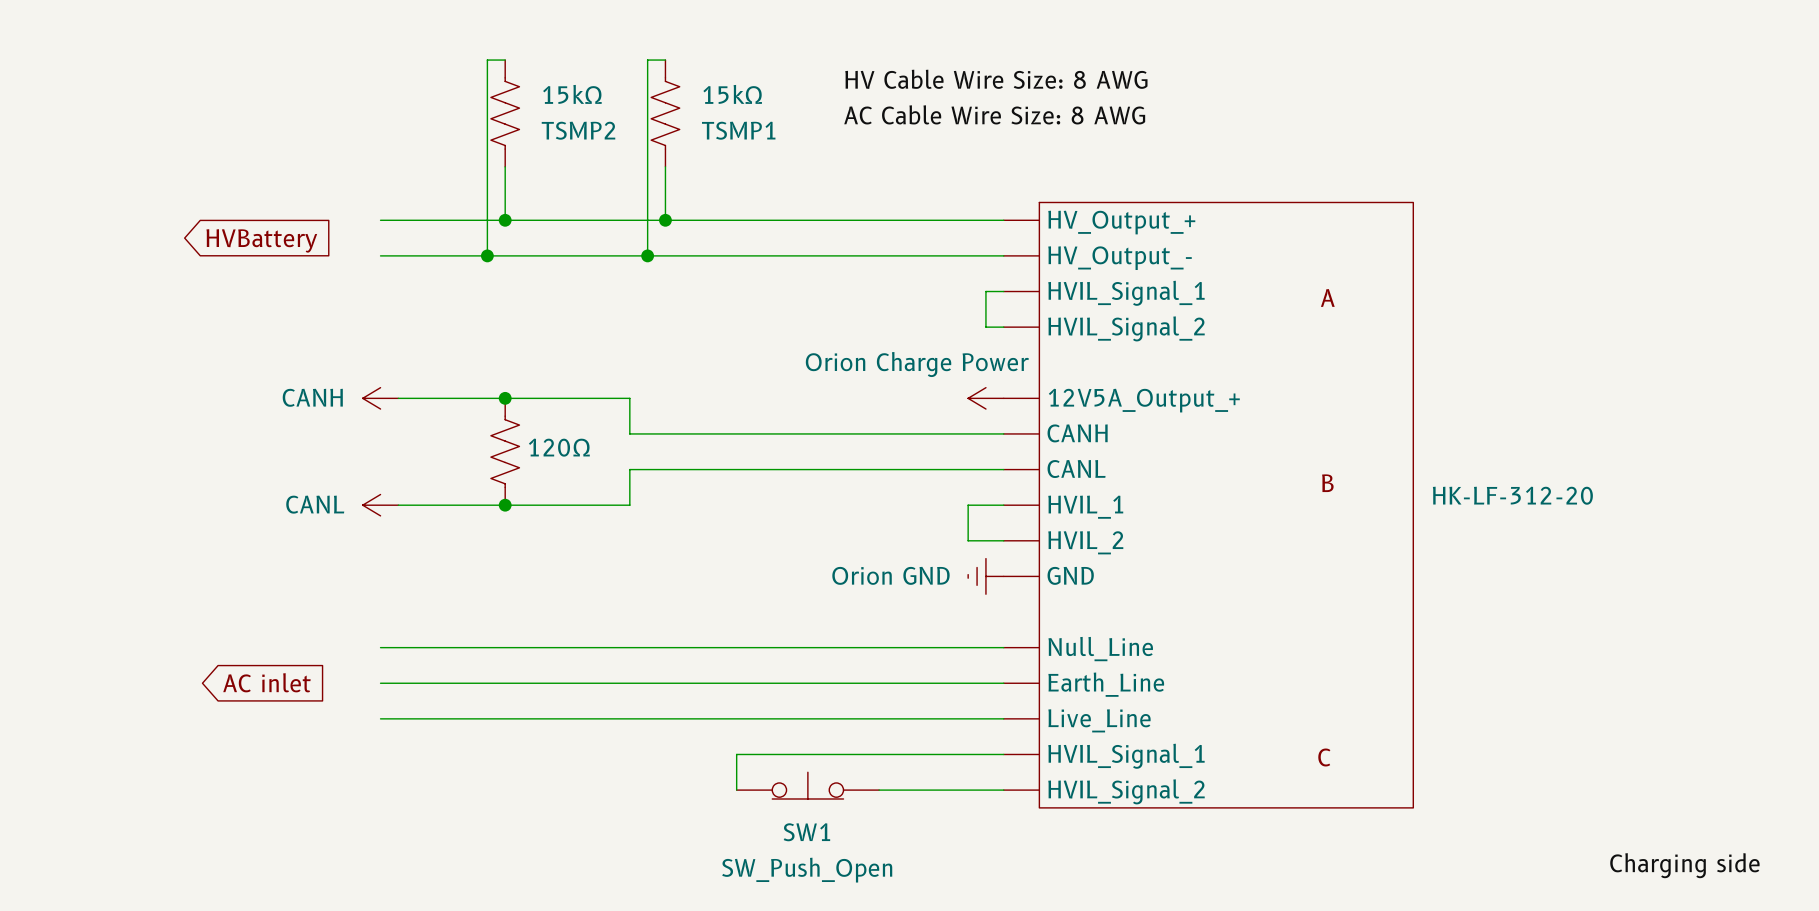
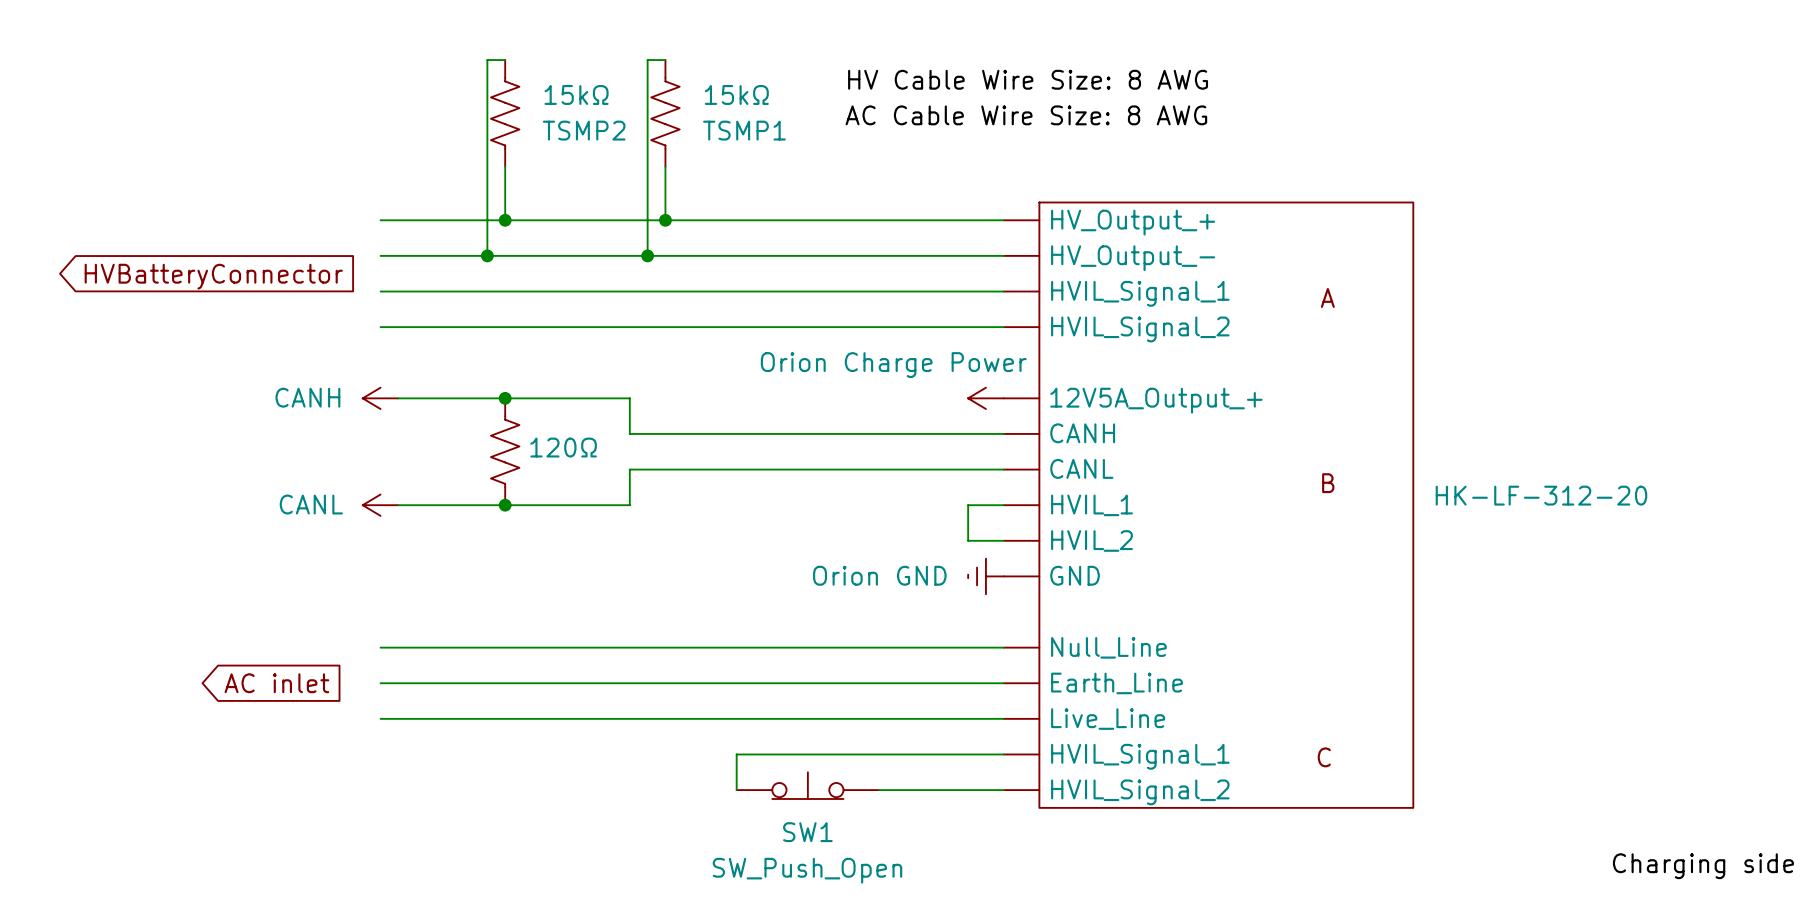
global label: HVBattery (261, 240) -> HVBatteryConnector (213, 276)
wire: (985, 291) (985, 327) -> (985, 291) (380, 291)
wire: none -> (380, 327) (985, 327)

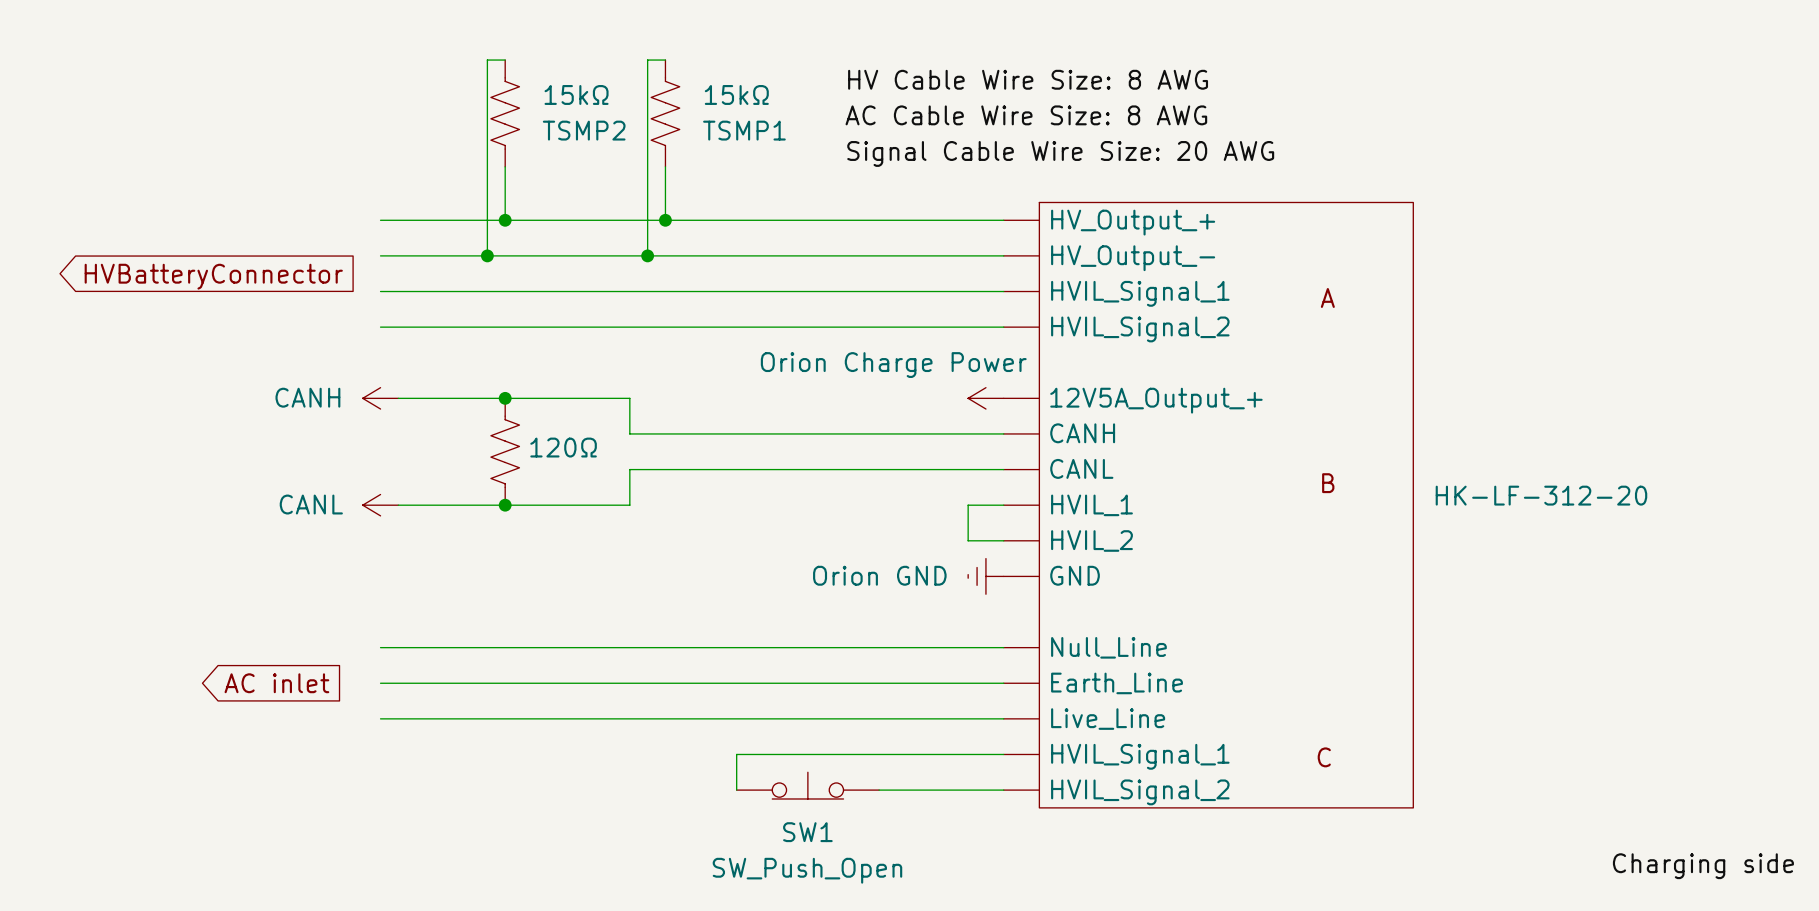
label: none -> Signal Cable Wire Size: 20 AWG (1060, 153)

